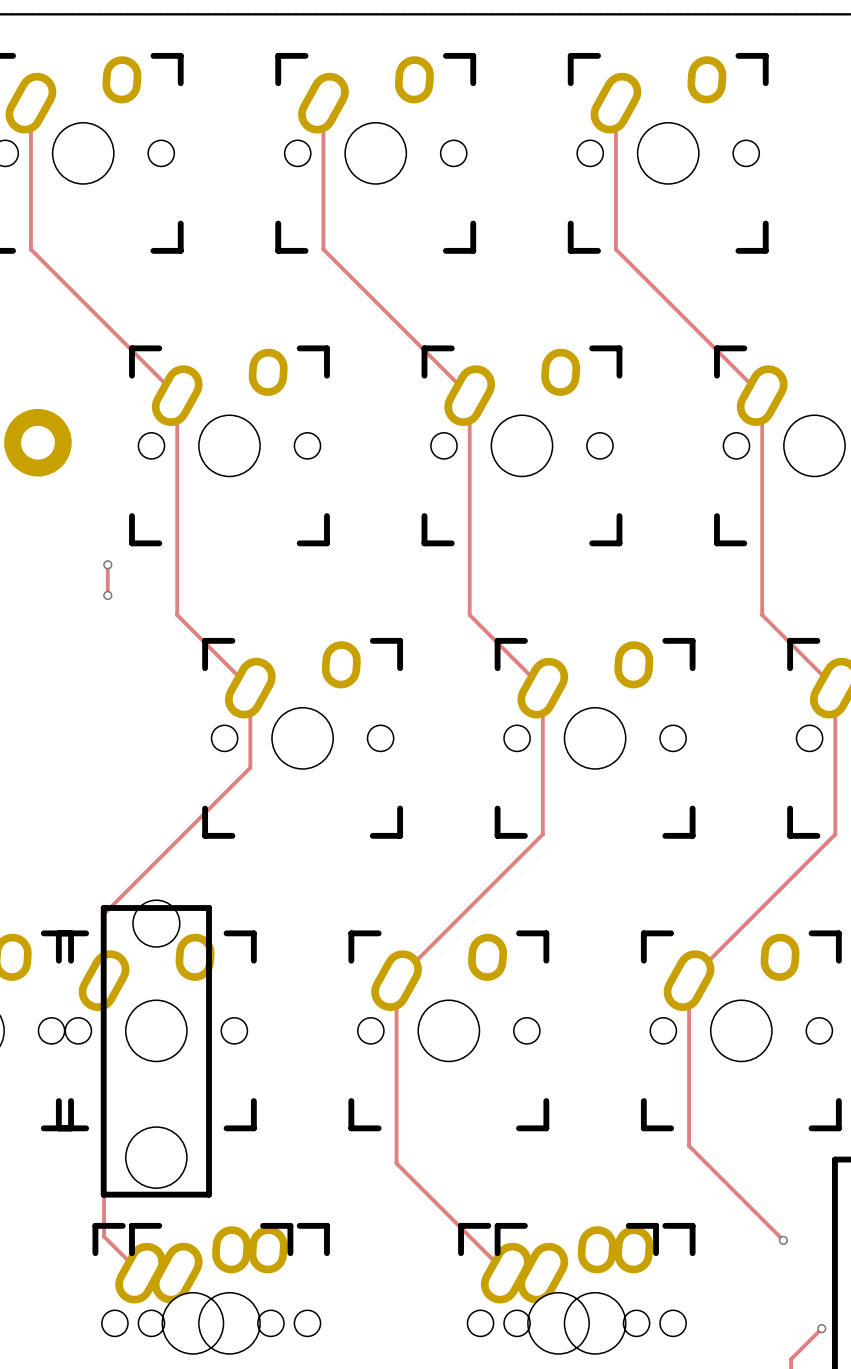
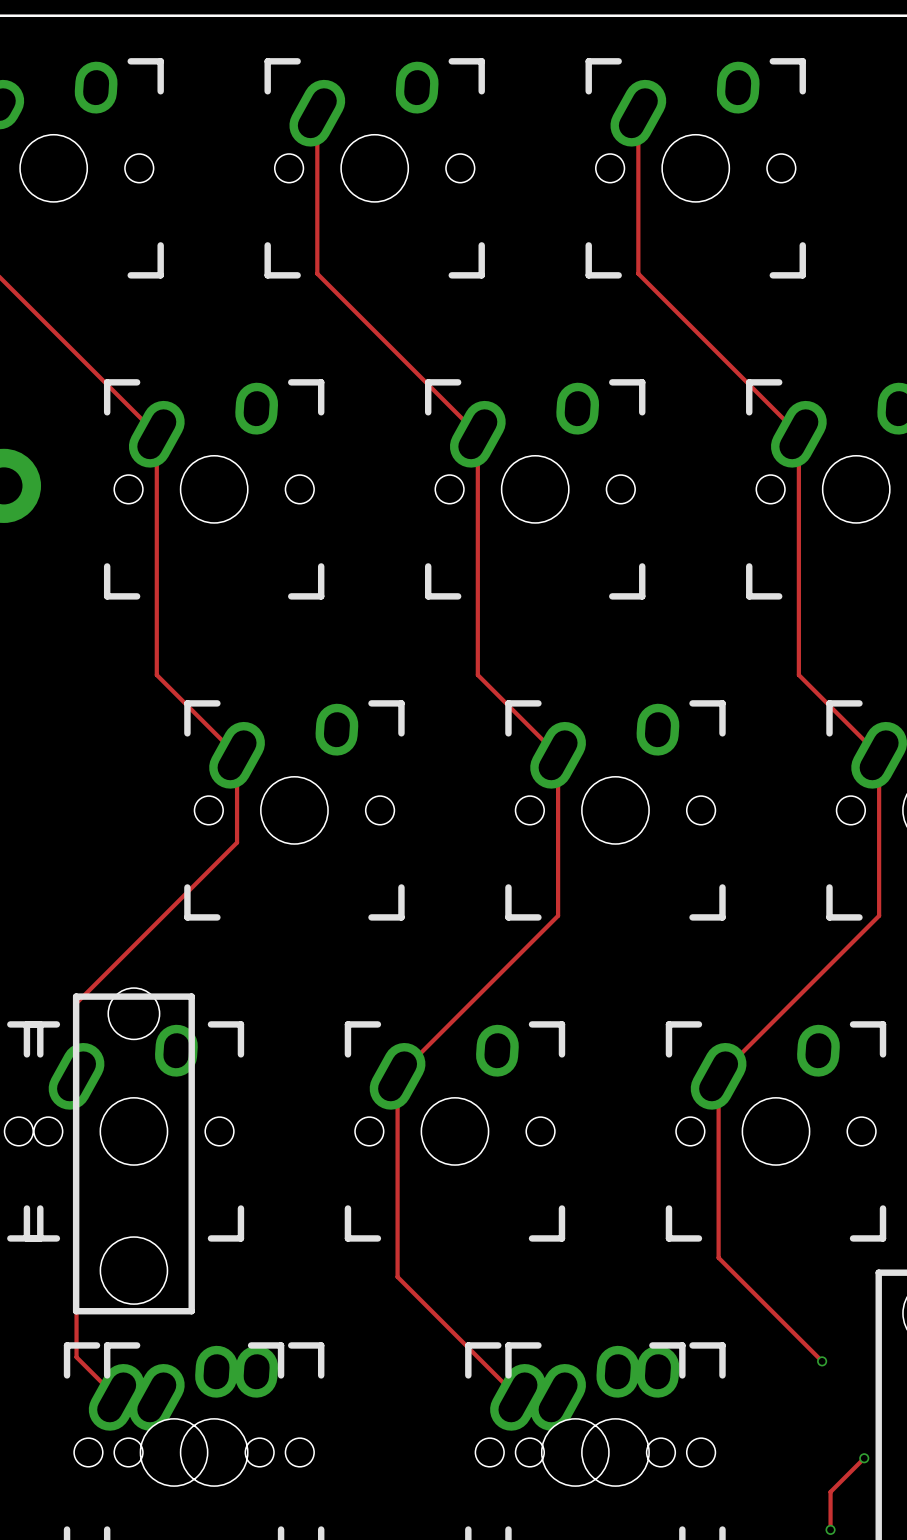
track: (107, 564) (107, 595) -> none
via: (107, 564) -> none
via: (107, 595) -> none

